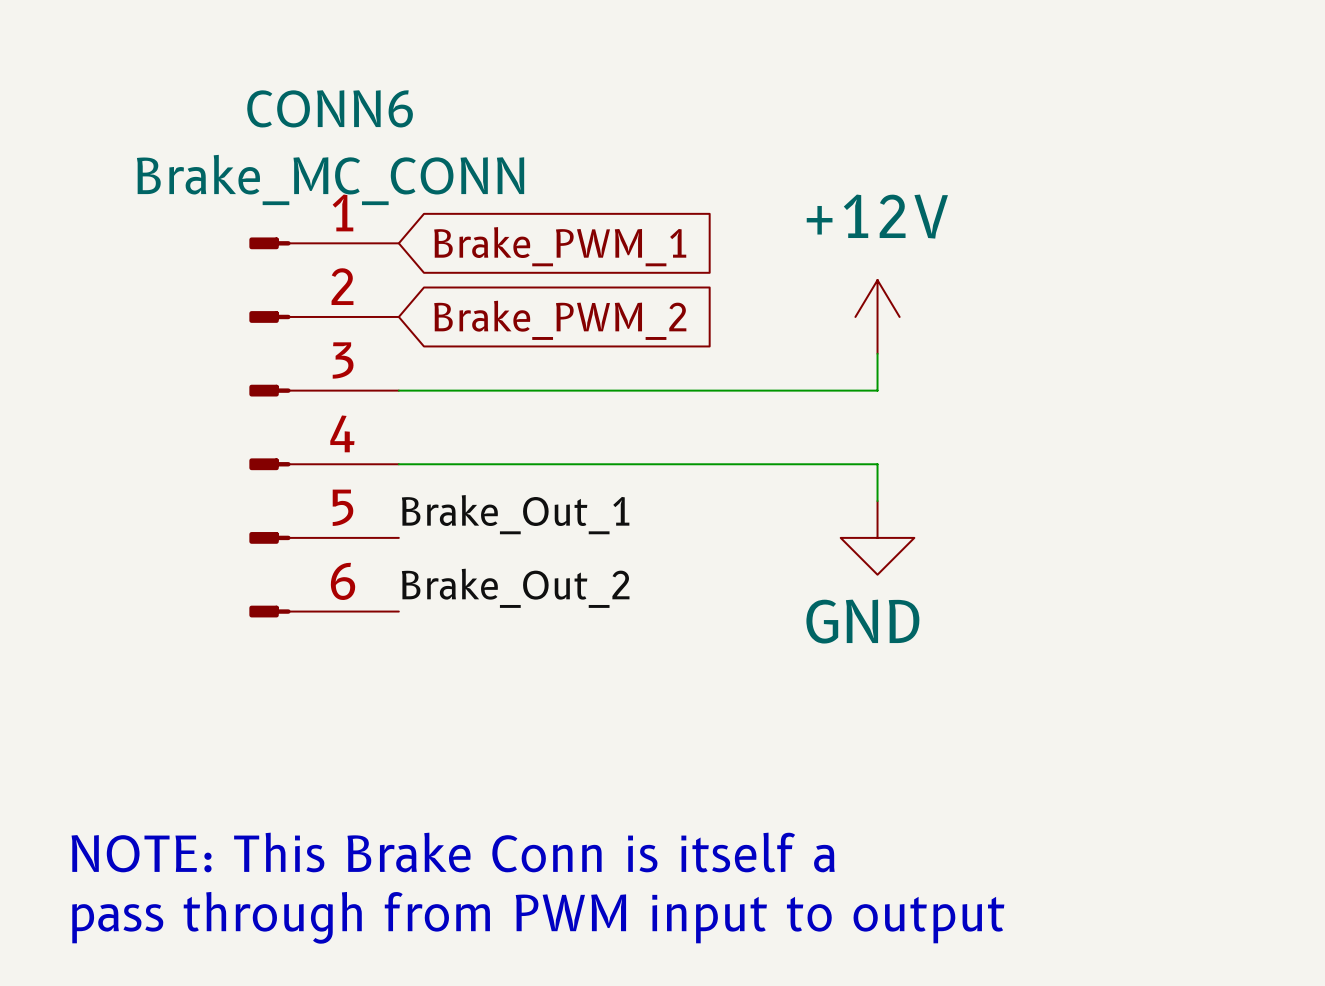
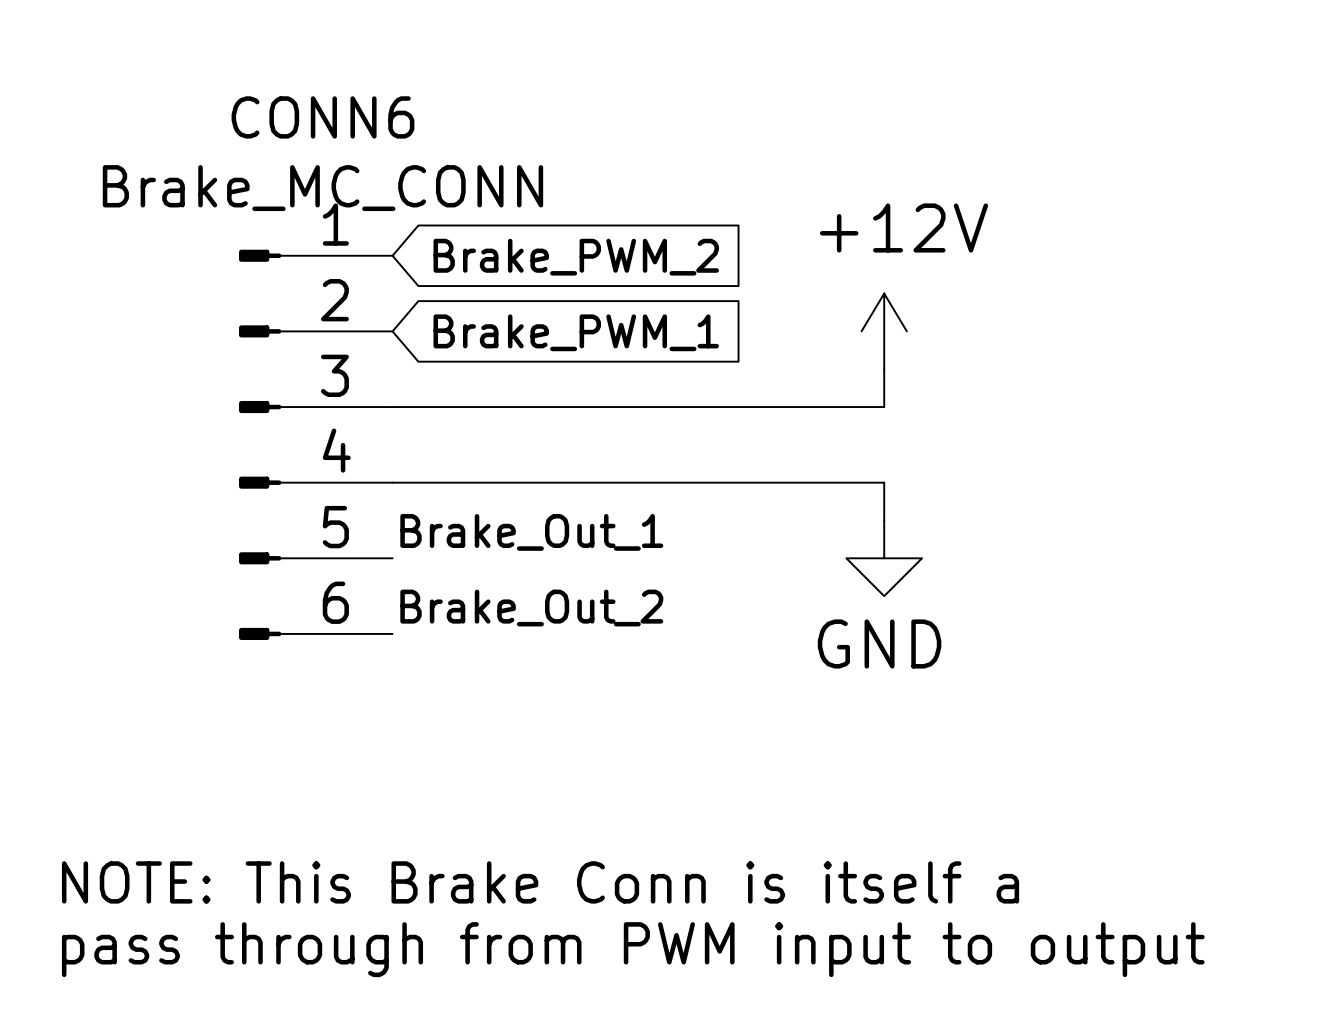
global label: Brake_PWM_1 (560, 246) -> Brake_PWM_2 (576, 257)
global label: Brake_PWM_2 (560, 320) -> Brake_PWM_1 (576, 332)

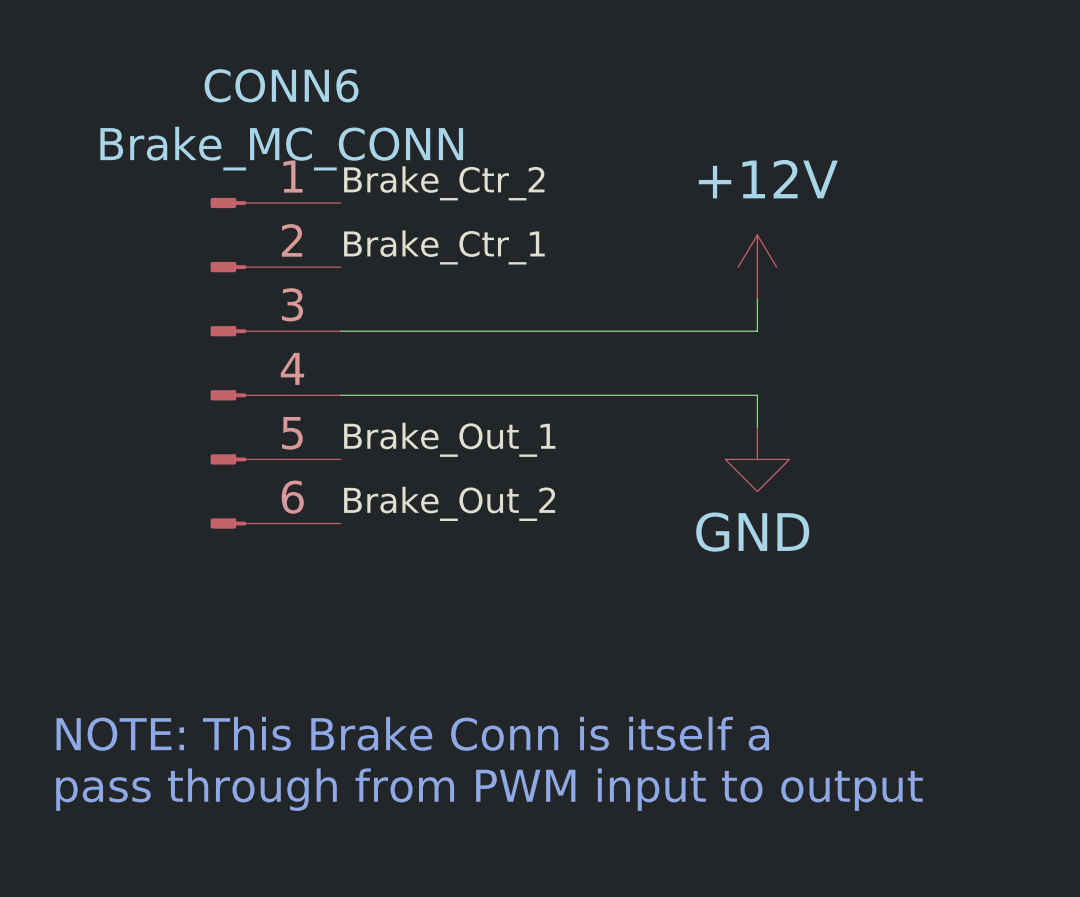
label: none -> Brake_Ctr_2 (444, 183)
global label: Brake_PWM_2 (576, 257) -> none
label: none -> Brake_Ctr_1 (444, 247)
global label: Brake_PWM_1 (576, 332) -> none

